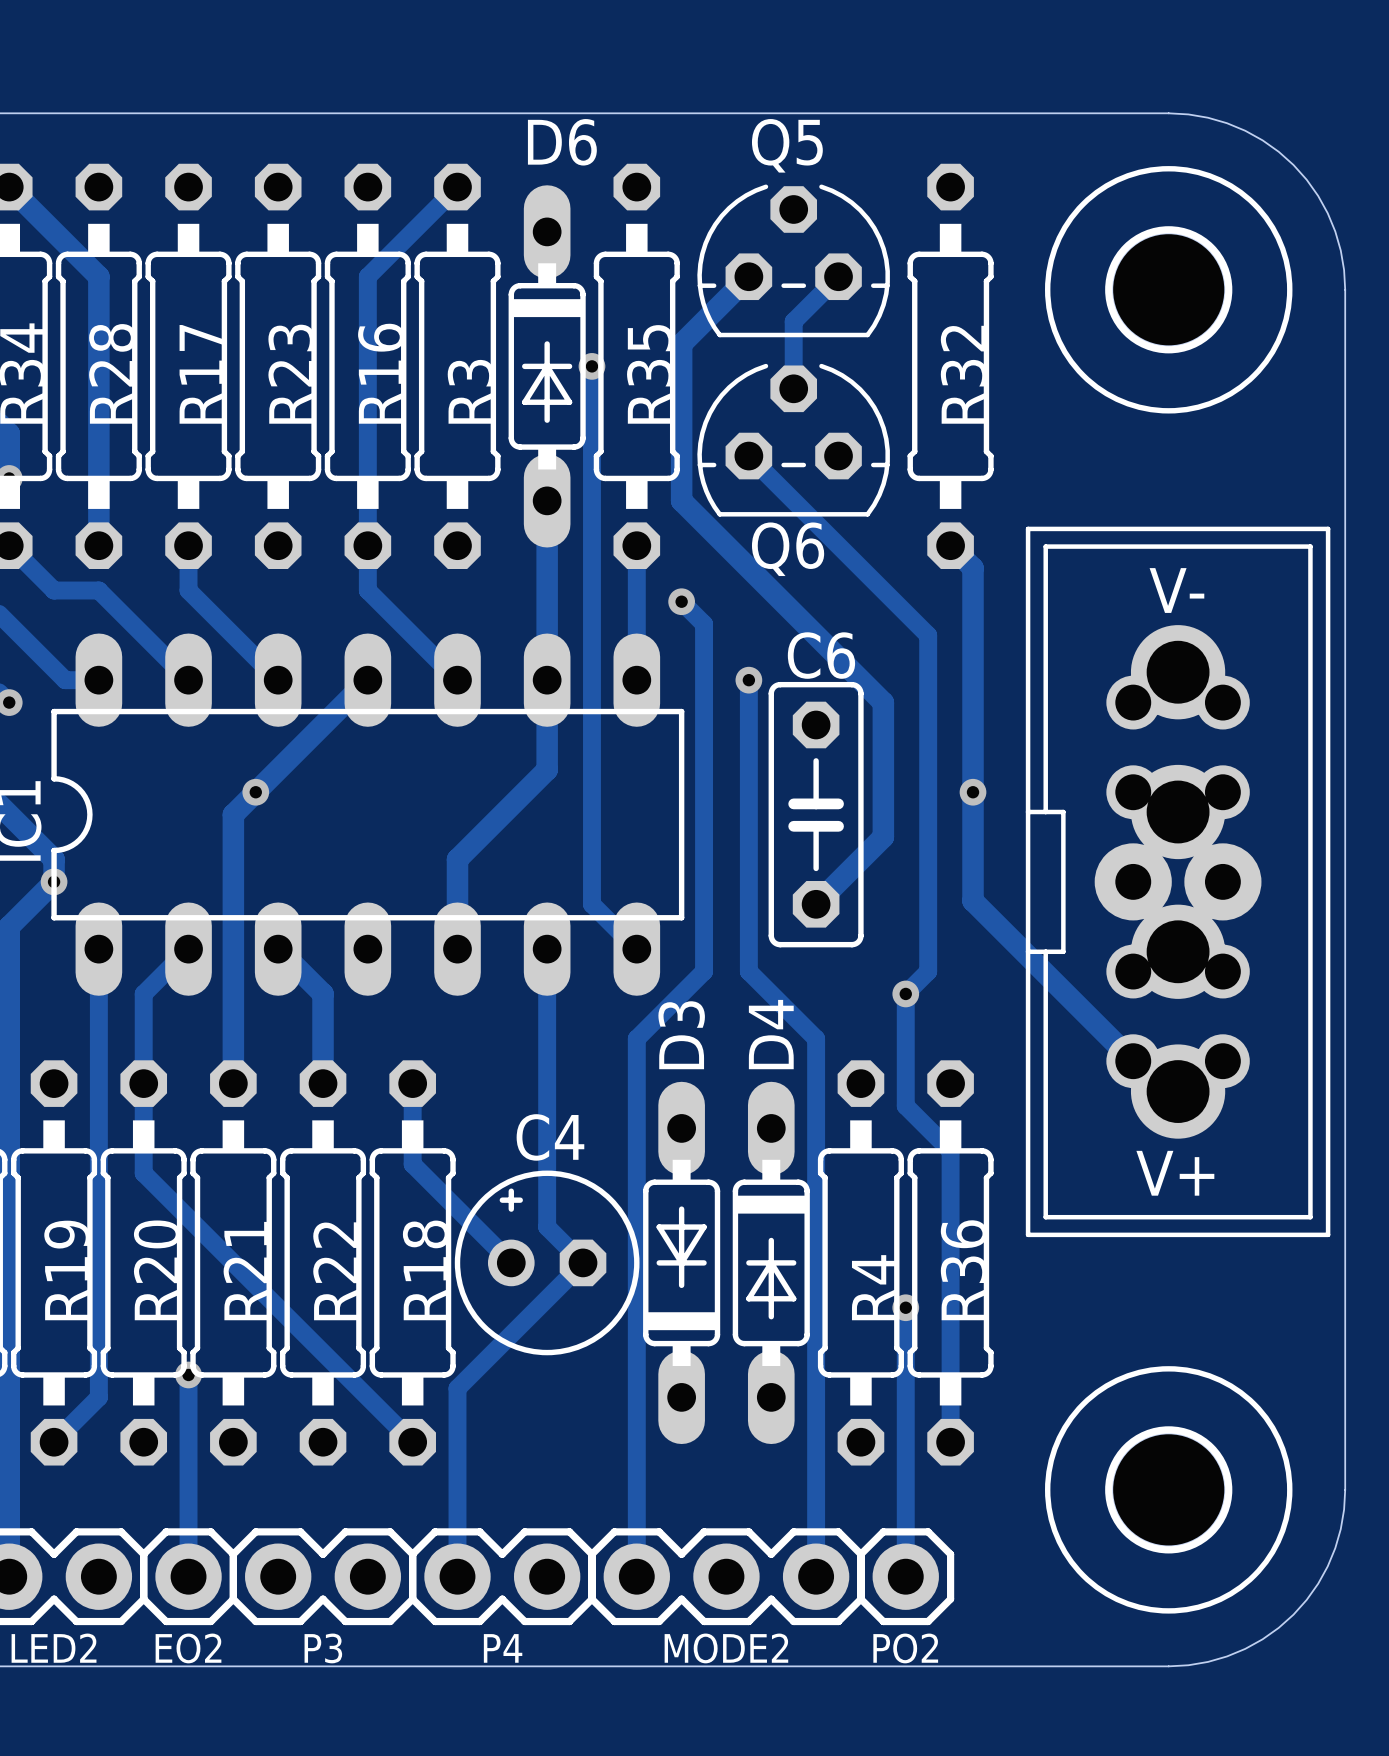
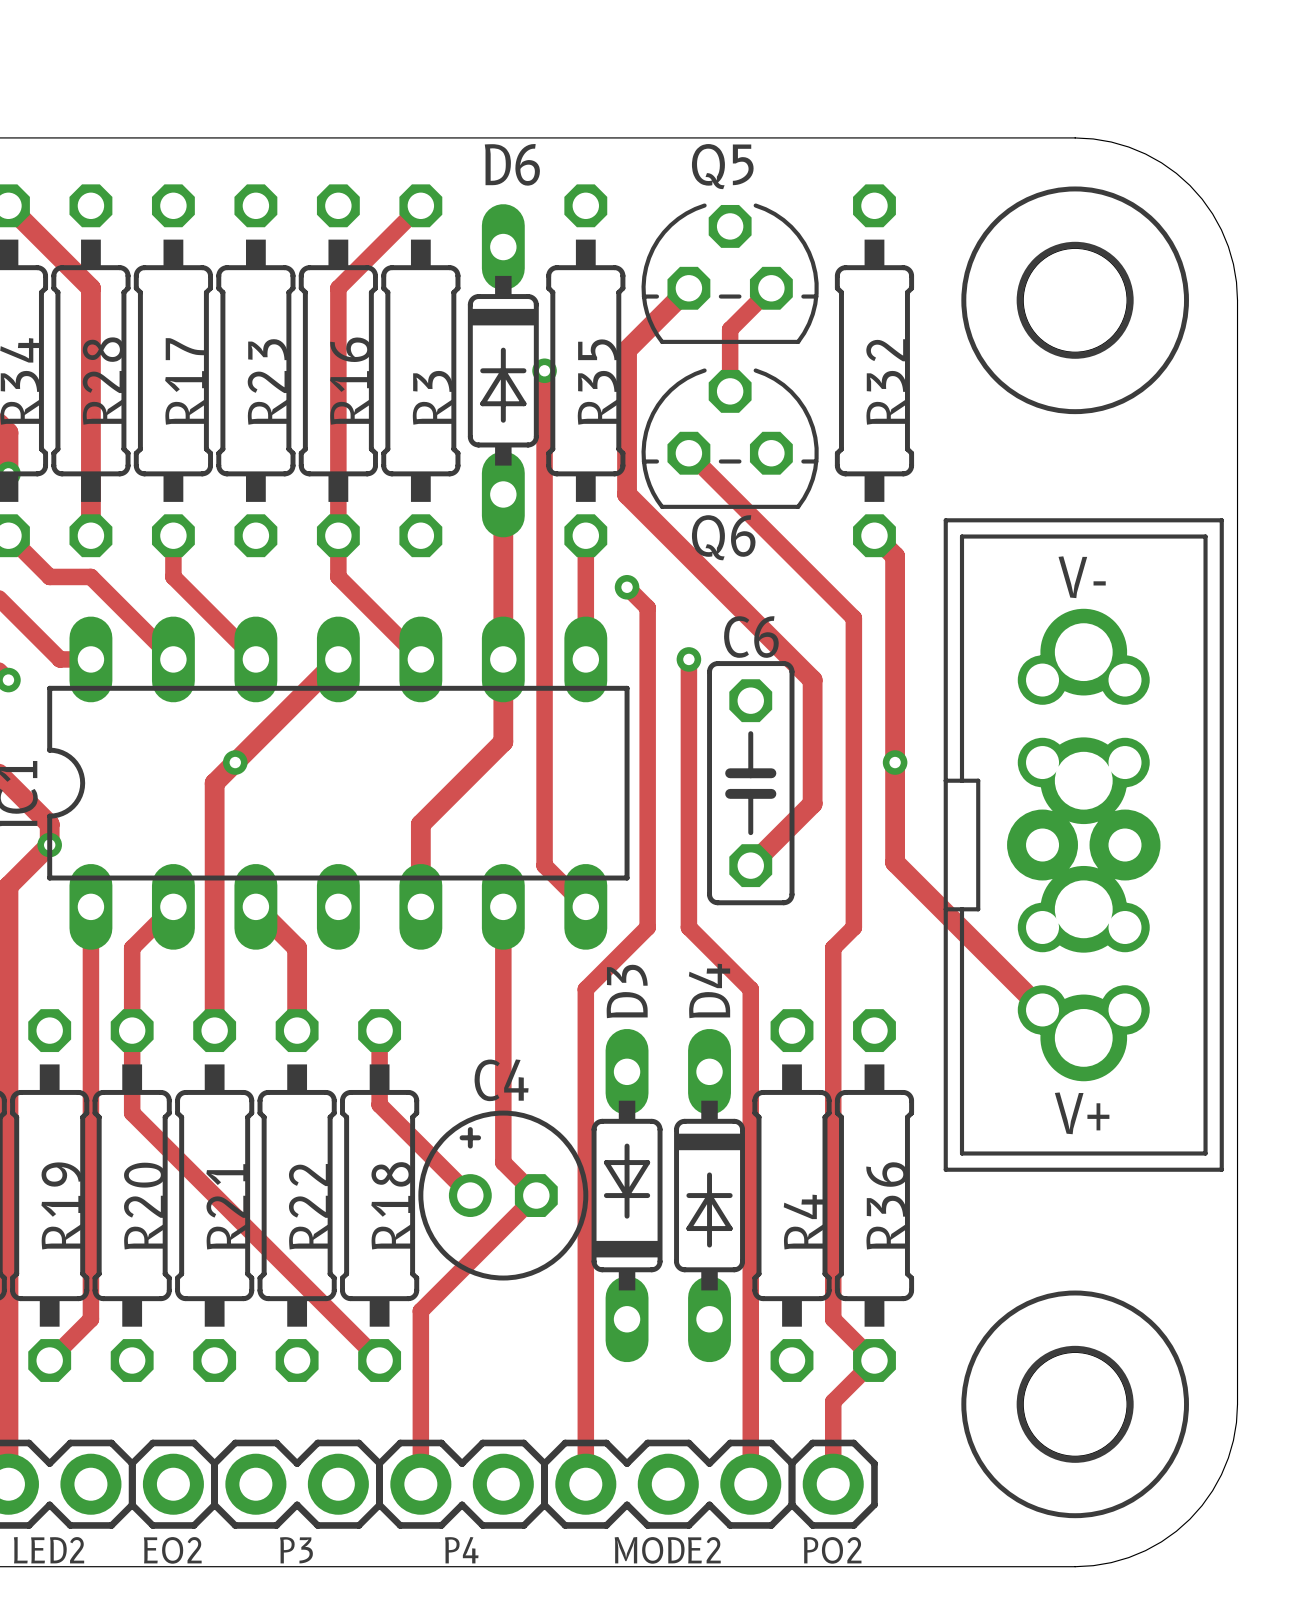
via: (905, 993) -> none
track: (905, 1106) (950, 1150) (950, 1442) -> (833, 1051) (833, 1236)
via: (905, 1307) -> none
track: (188, 1374) (188, 1576) -> none
via: (188, 1374) -> none
track: (905, 1397) (905, 1487) -> (833, 1319) (874, 1360) (833, 1401)

